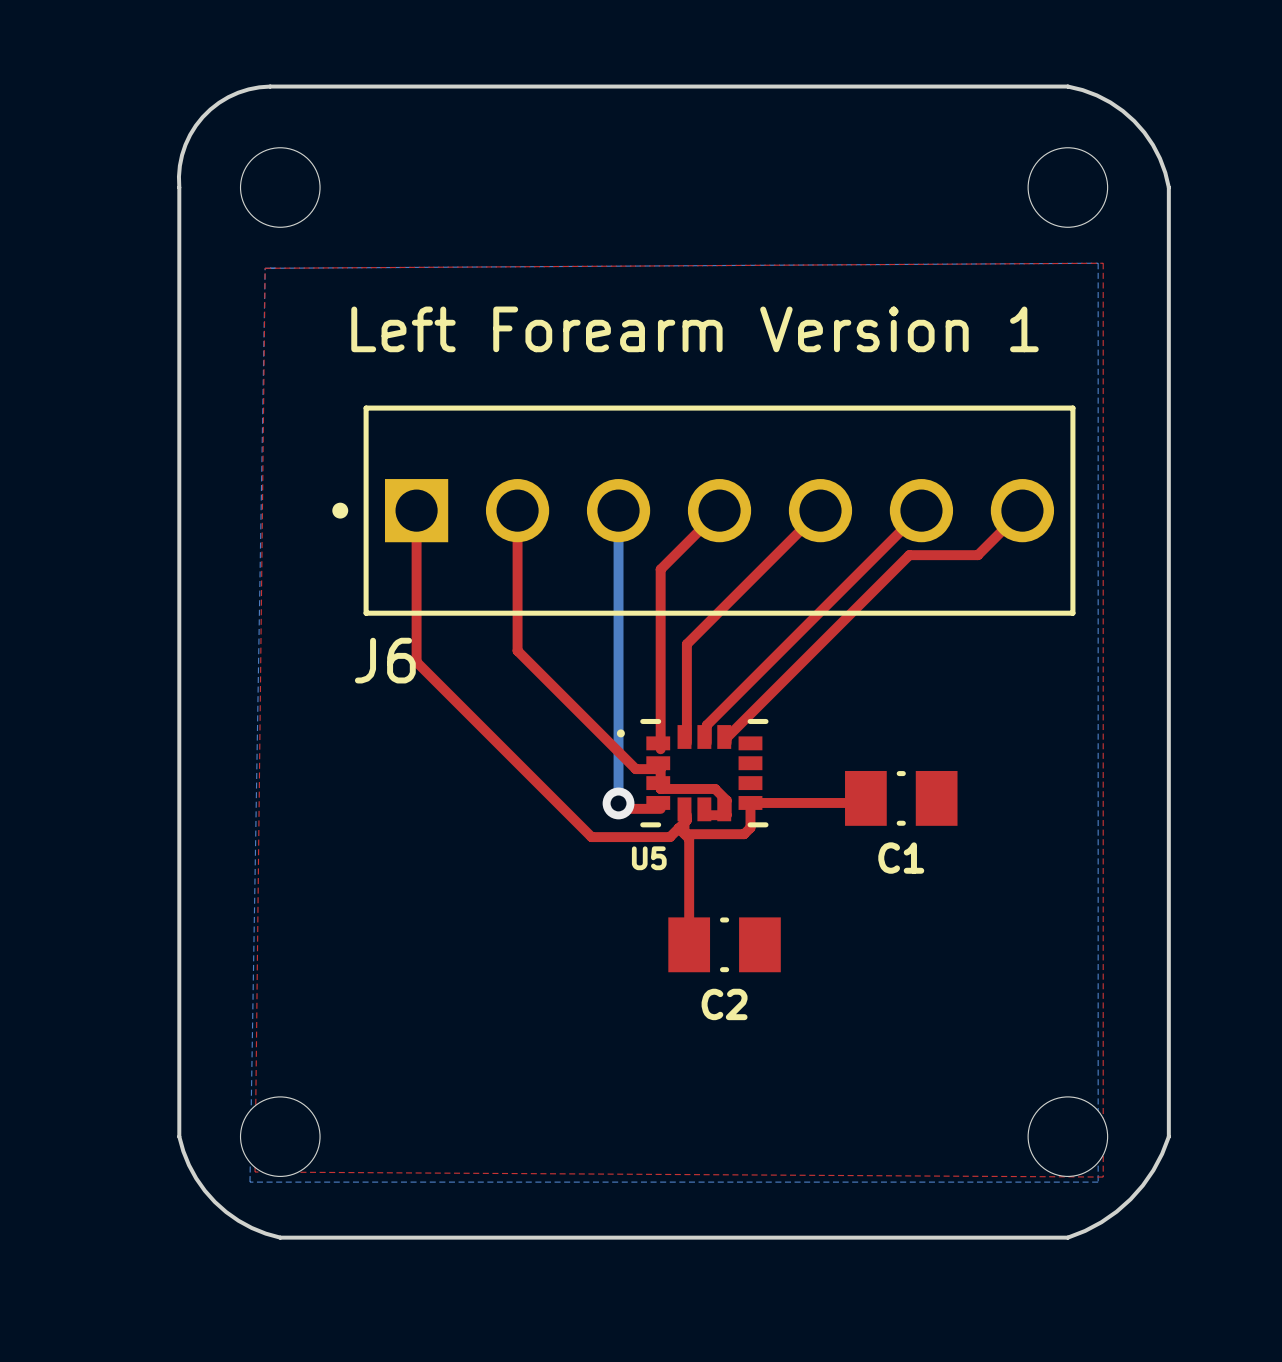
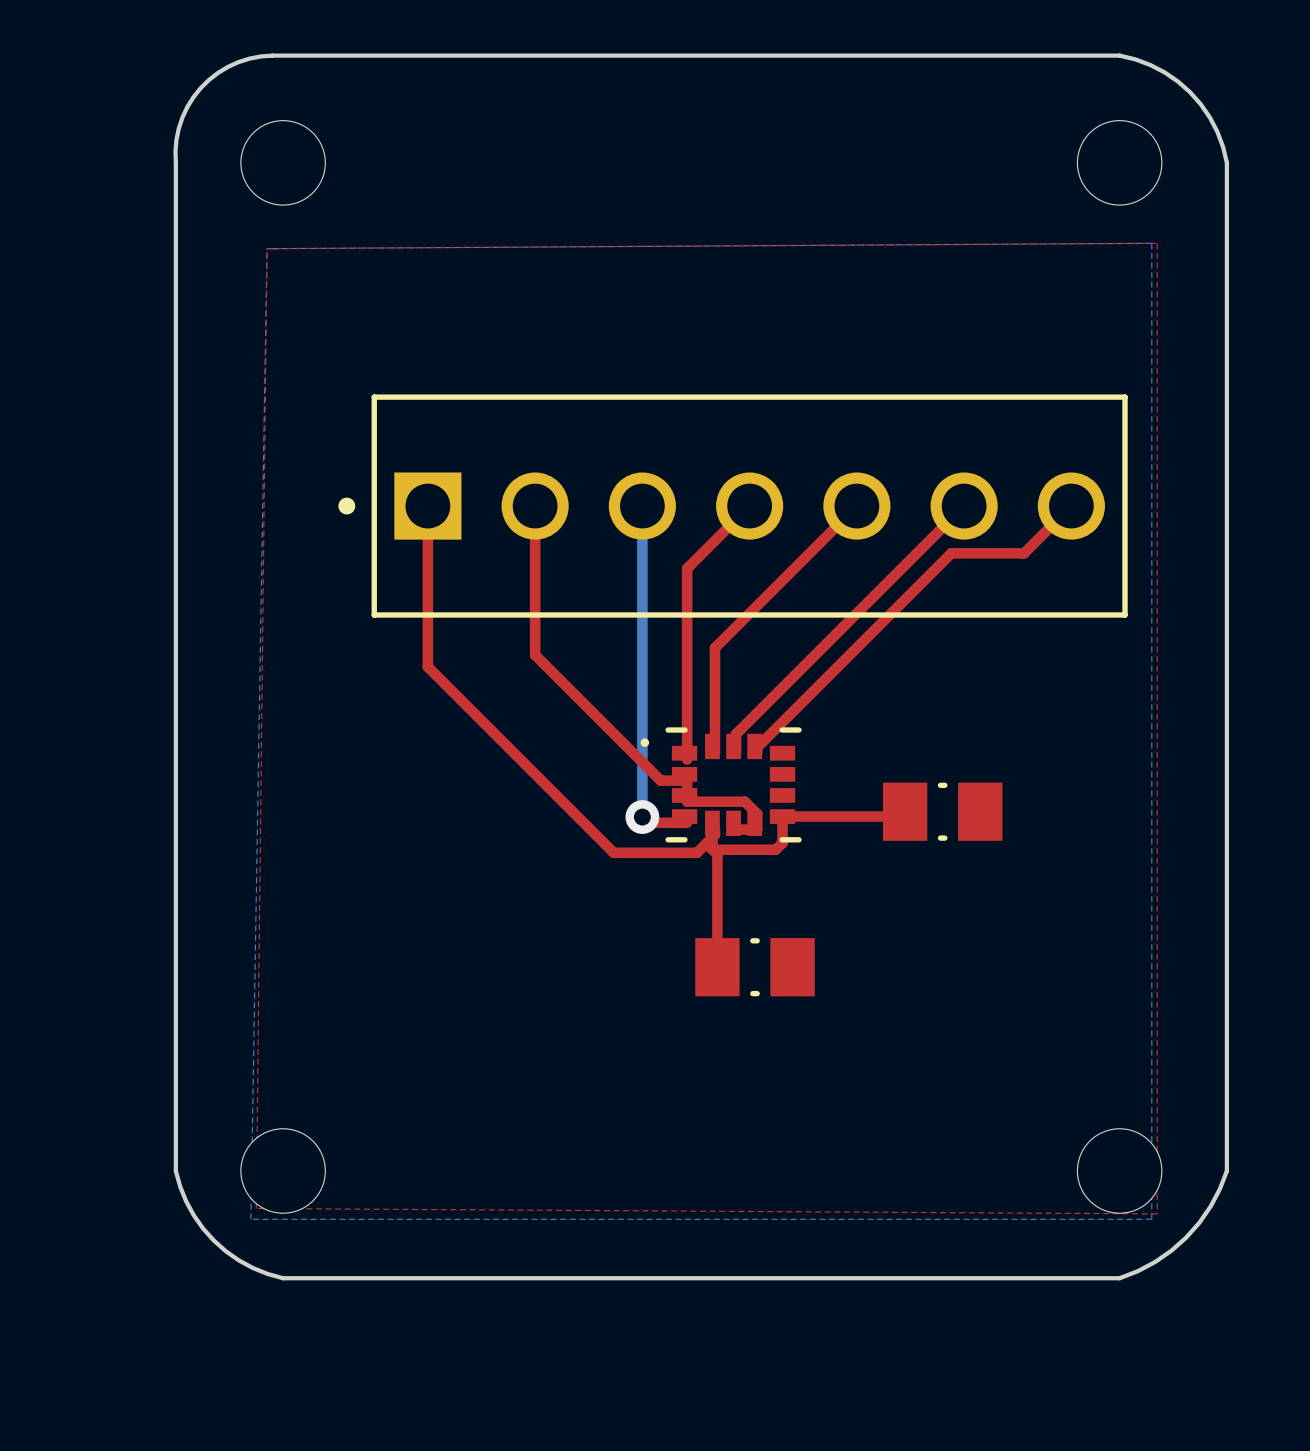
text: Left Forearm Version 1 (694, 329) -> none
J6 name: J6 (385, 660) -> none
U5 name: U5 (649, 858) -> none
C1 name: C1 (901, 858) -> none
C2 name: C2 (724, 1004) -> none

